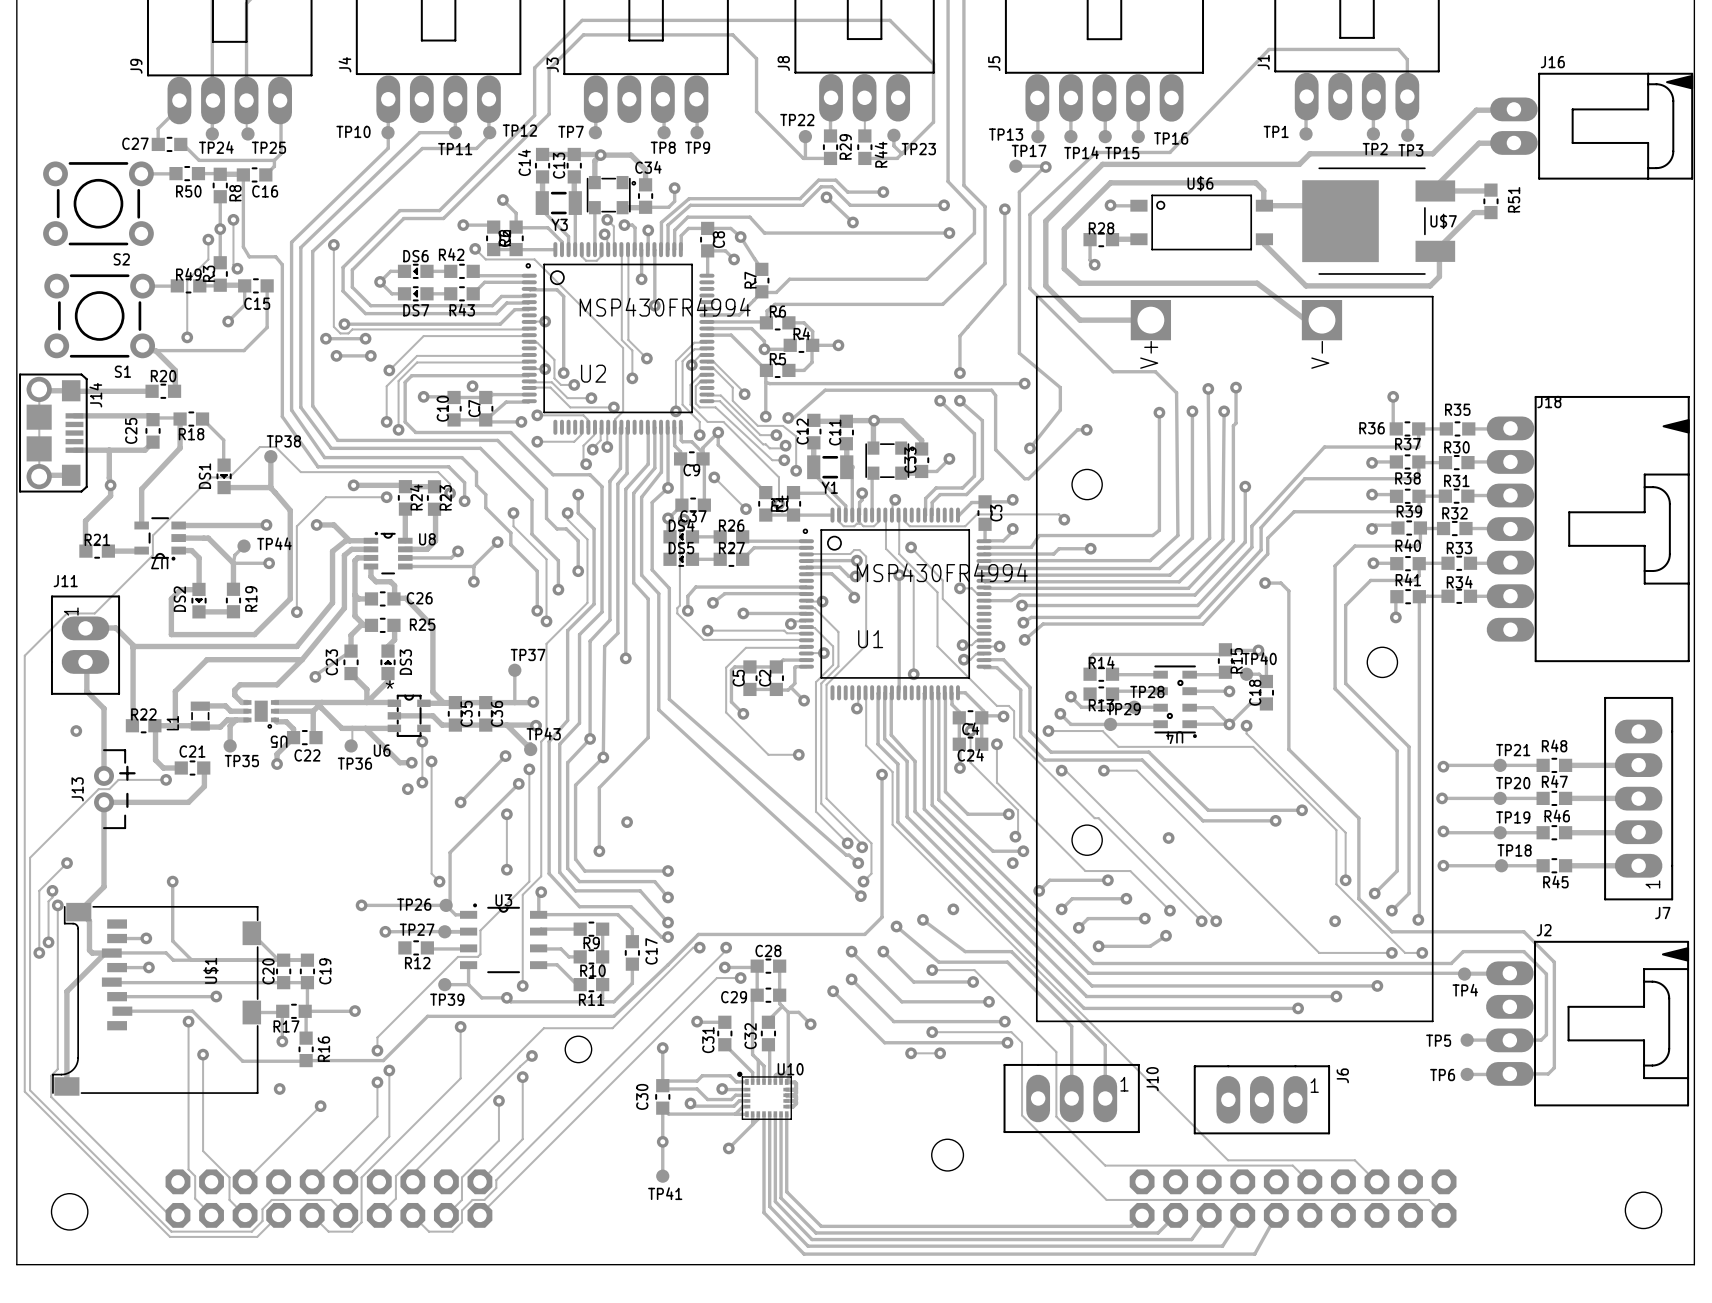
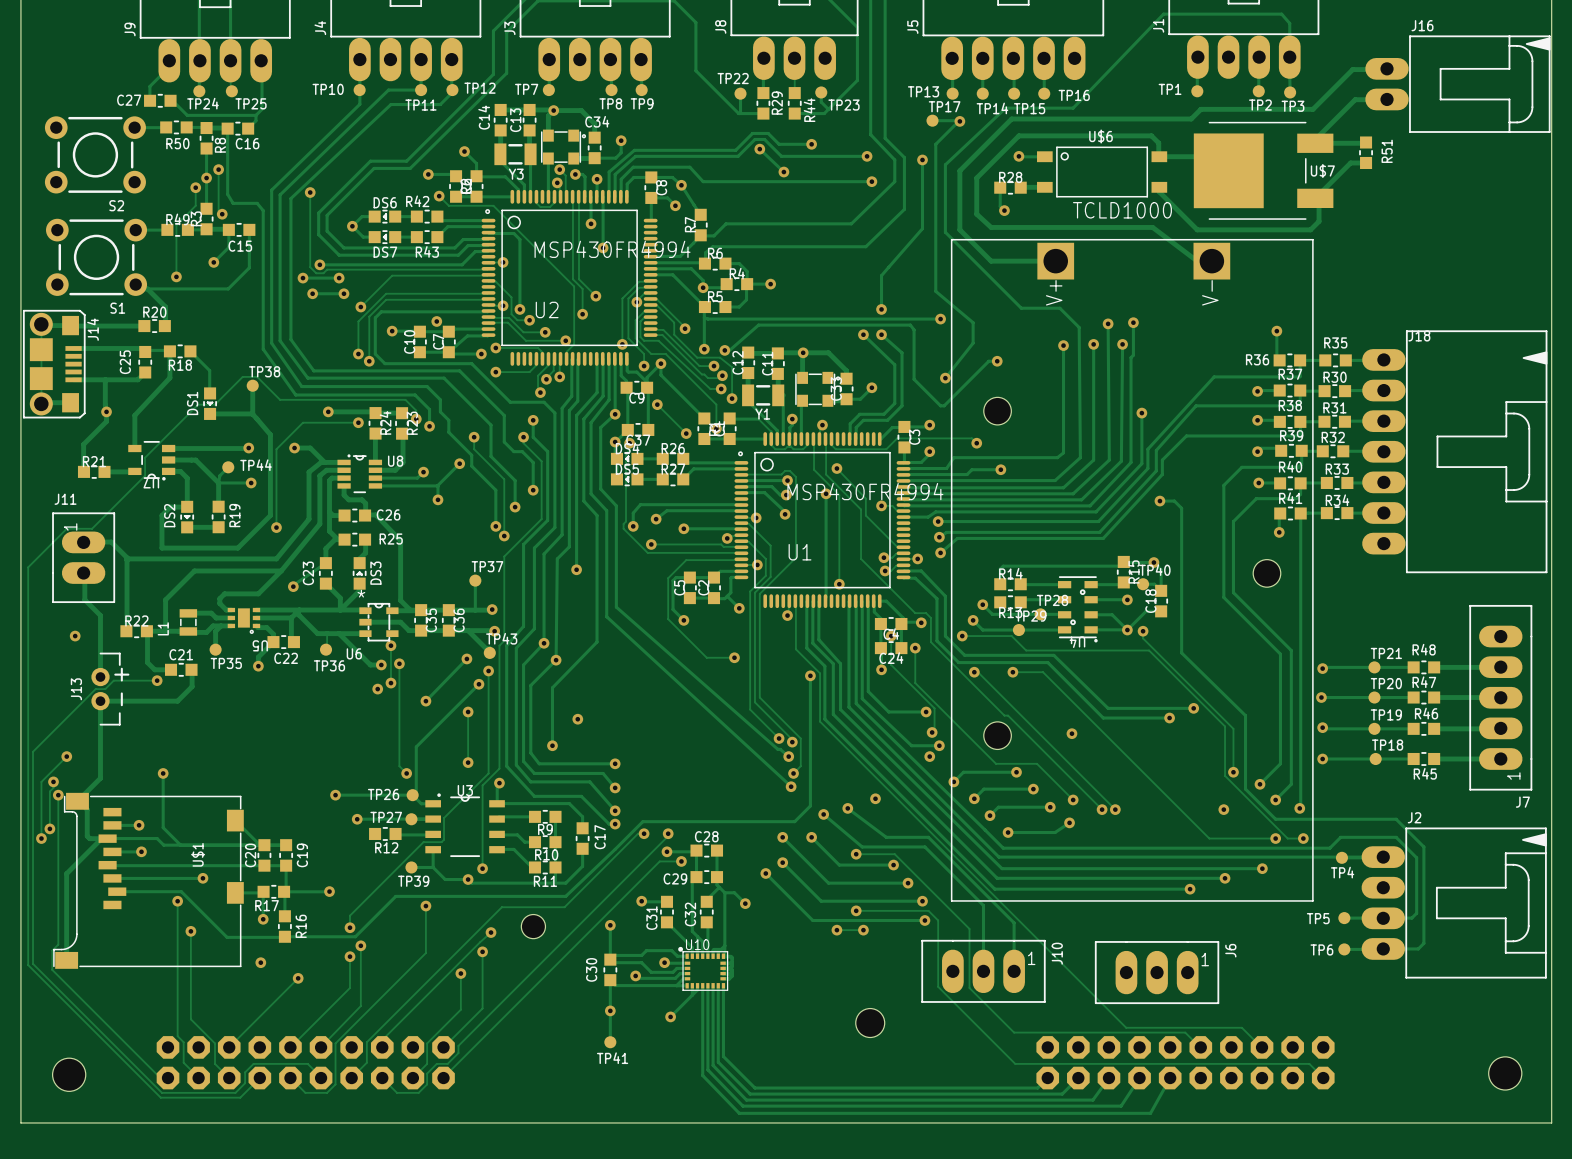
U$6 value: none -> TCLD1000 (1122, 210)
U10 name position: U10 (790, 1069) -> U10 (697, 944)

